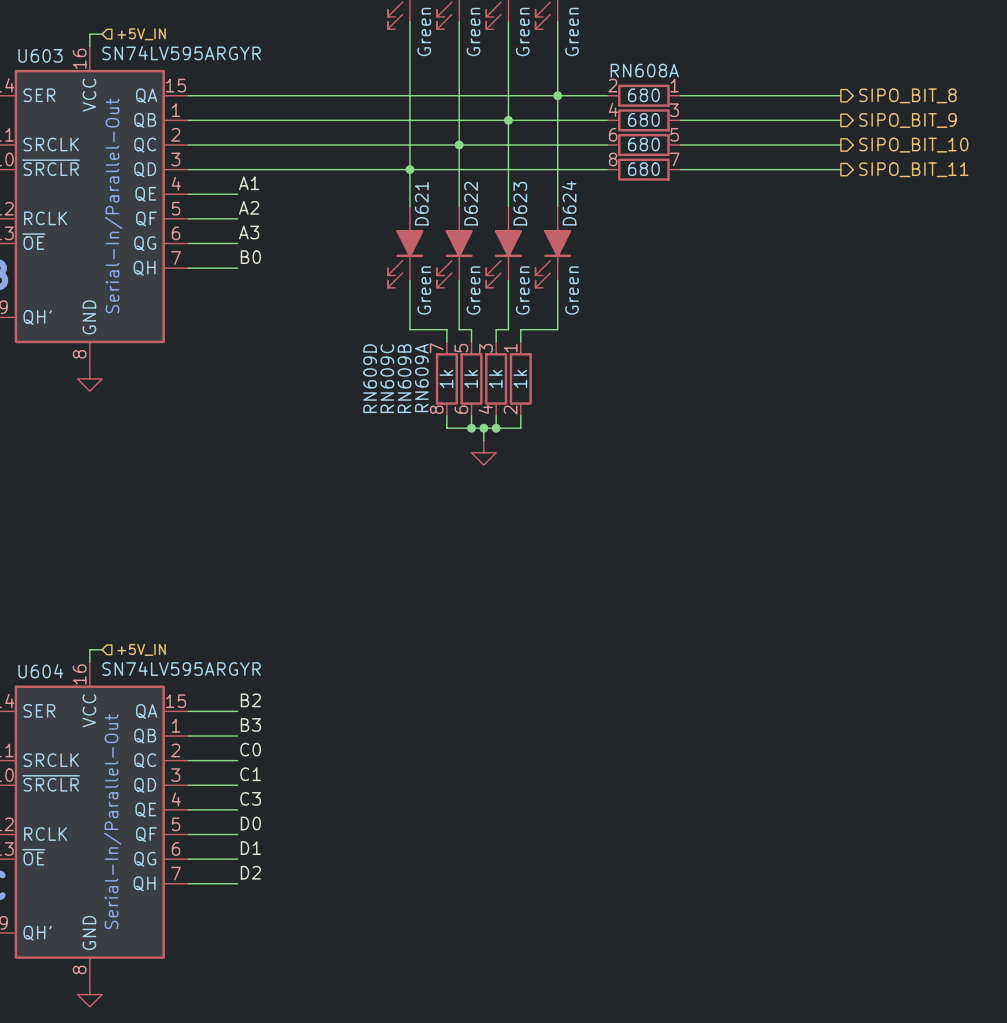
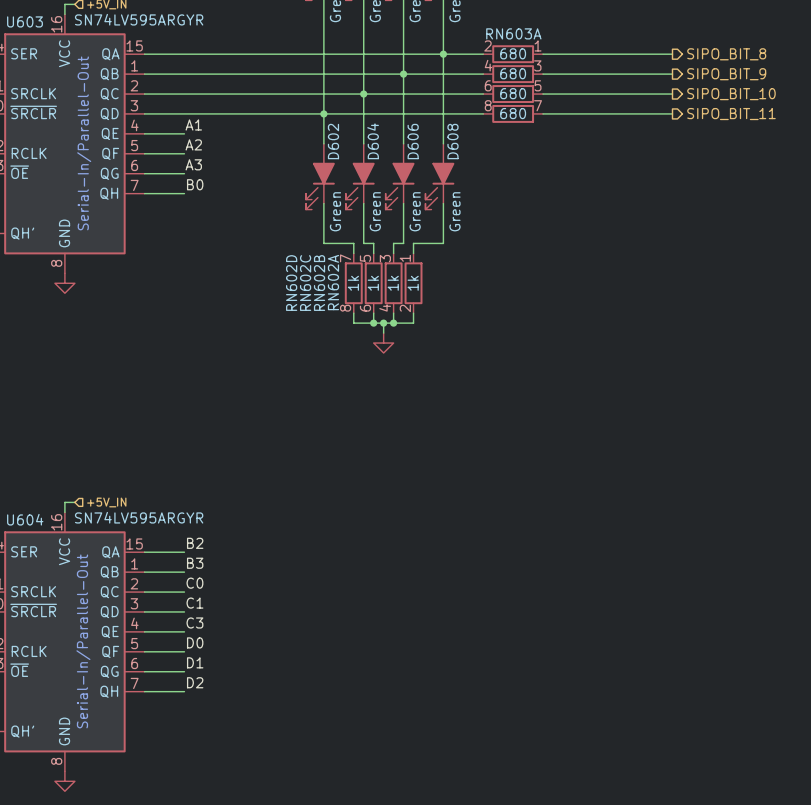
RN608A name: RN608A (644, 70) -> RN603A (513, 33)
D621 name: D621 (421, 203) -> D602 (333, 141)
D622 name: D622 (471, 203) -> D604 (373, 141)
D623 name: D623 (520, 203) -> D606 (413, 141)
D624 name: D624 (569, 203) -> D608 (453, 141)
RN609D name: RN609D (370, 378) -> RN602D (291, 283)
RN609C name: RN609C (387, 378) -> RN602C (305, 283)
RN609B name: RN609B (404, 378) -> RN602B (319, 283)
RN609A name: RN609A (421, 378) -> RN602A (333, 282)

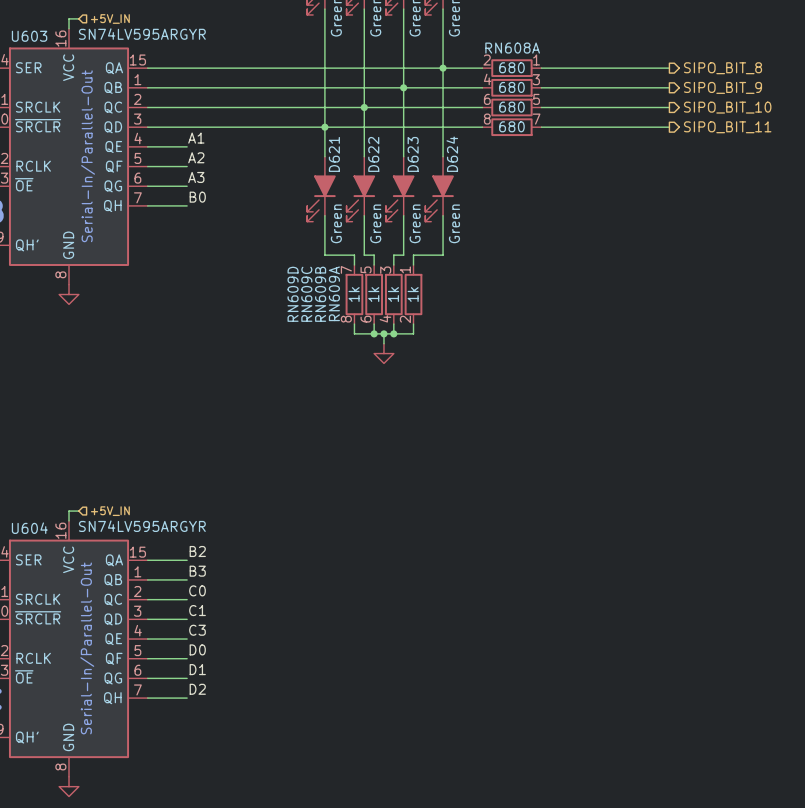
RN603A name: RN603A (513, 33) -> RN608A (512, 48)
D602 name: D602 (333, 141) -> D621 (334, 154)
D604 name: D604 (373, 141) -> D622 (373, 154)
D606 name: D606 (413, 141) -> D623 (413, 154)
D608 name: D608 (453, 141) -> D624 (452, 154)
RN602A name: RN602A (333, 282) -> RN609A (334, 293)
RN602D name: RN602D (291, 283) -> RN609D (293, 294)
RN602C name: RN602C (305, 283) -> RN609C (306, 294)
RN602B name: RN602B (319, 283) -> RN609B (320, 294)

